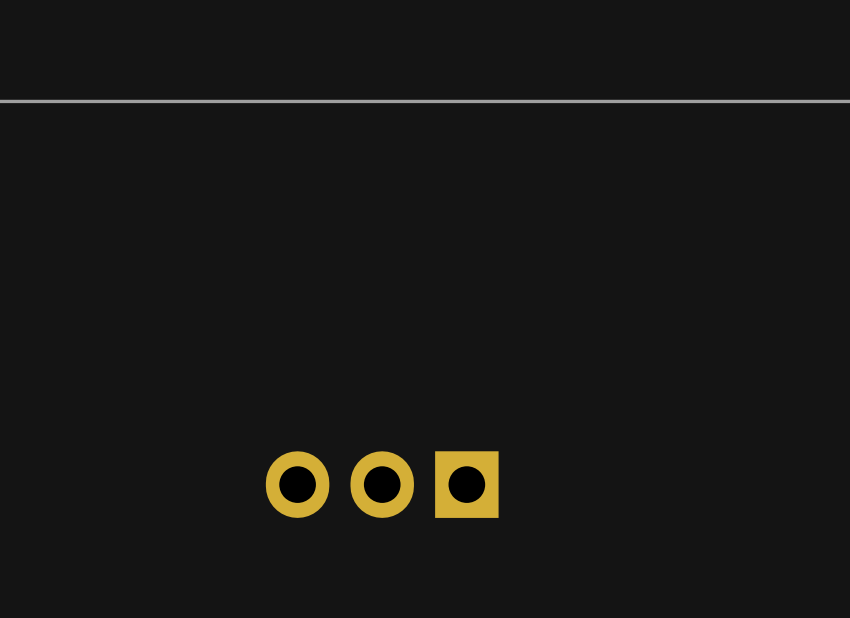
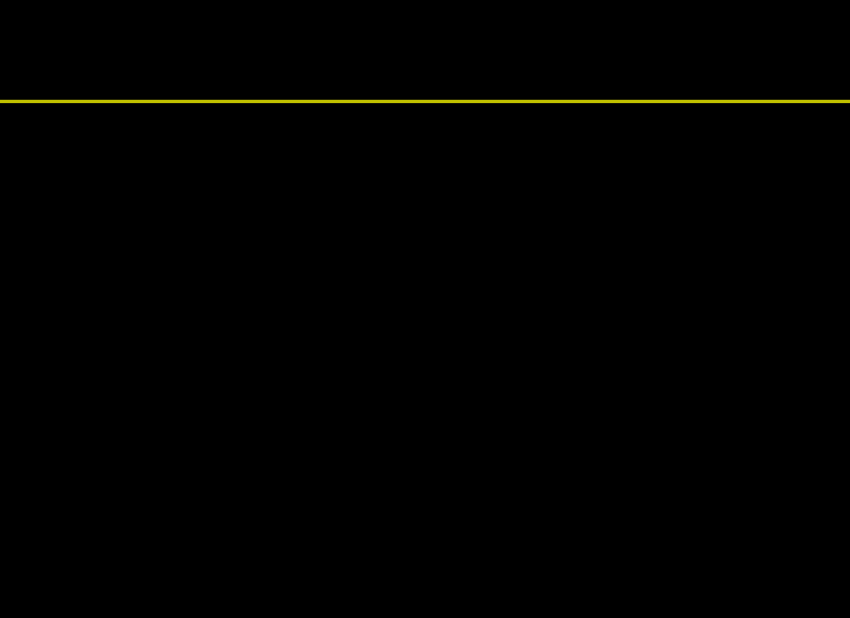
part: (382, 484) -> none

